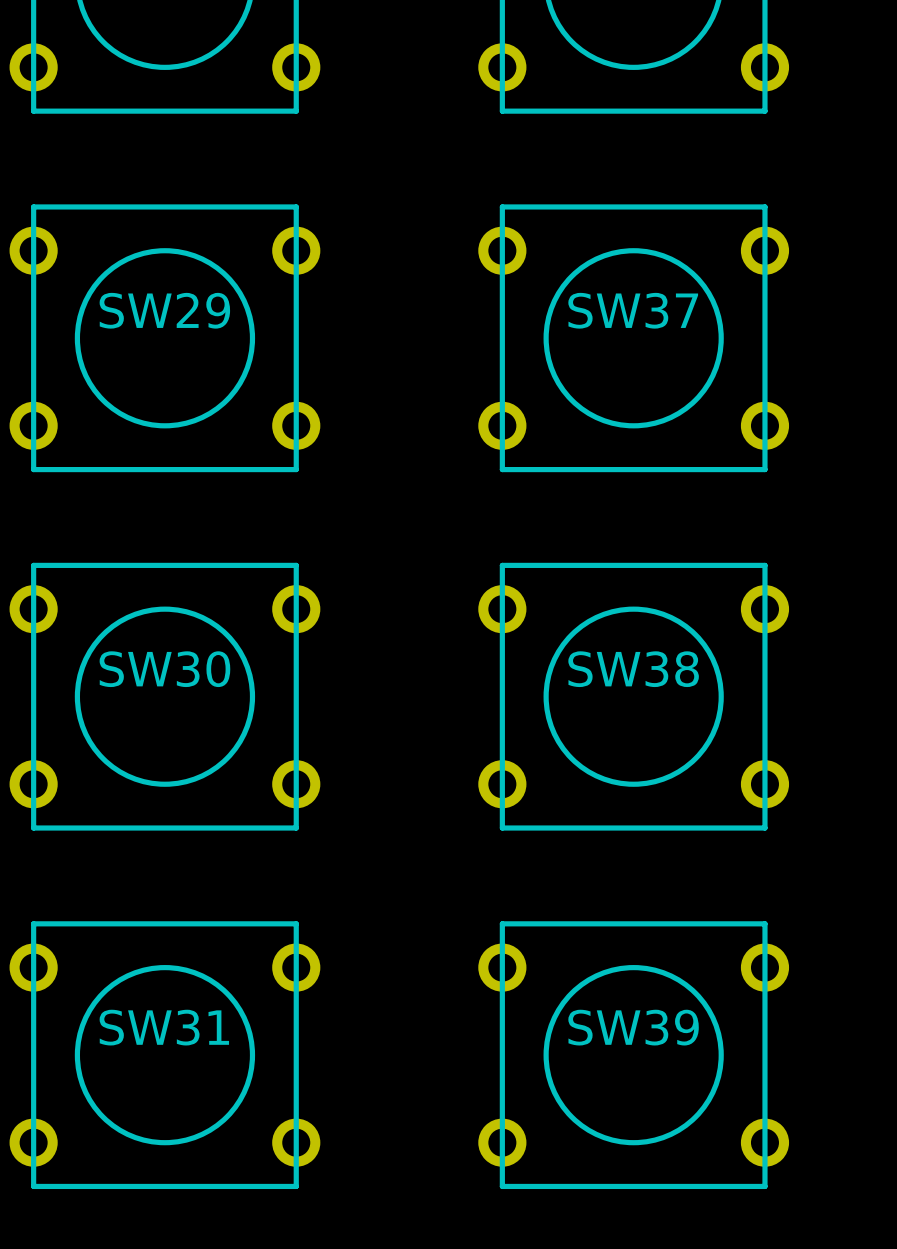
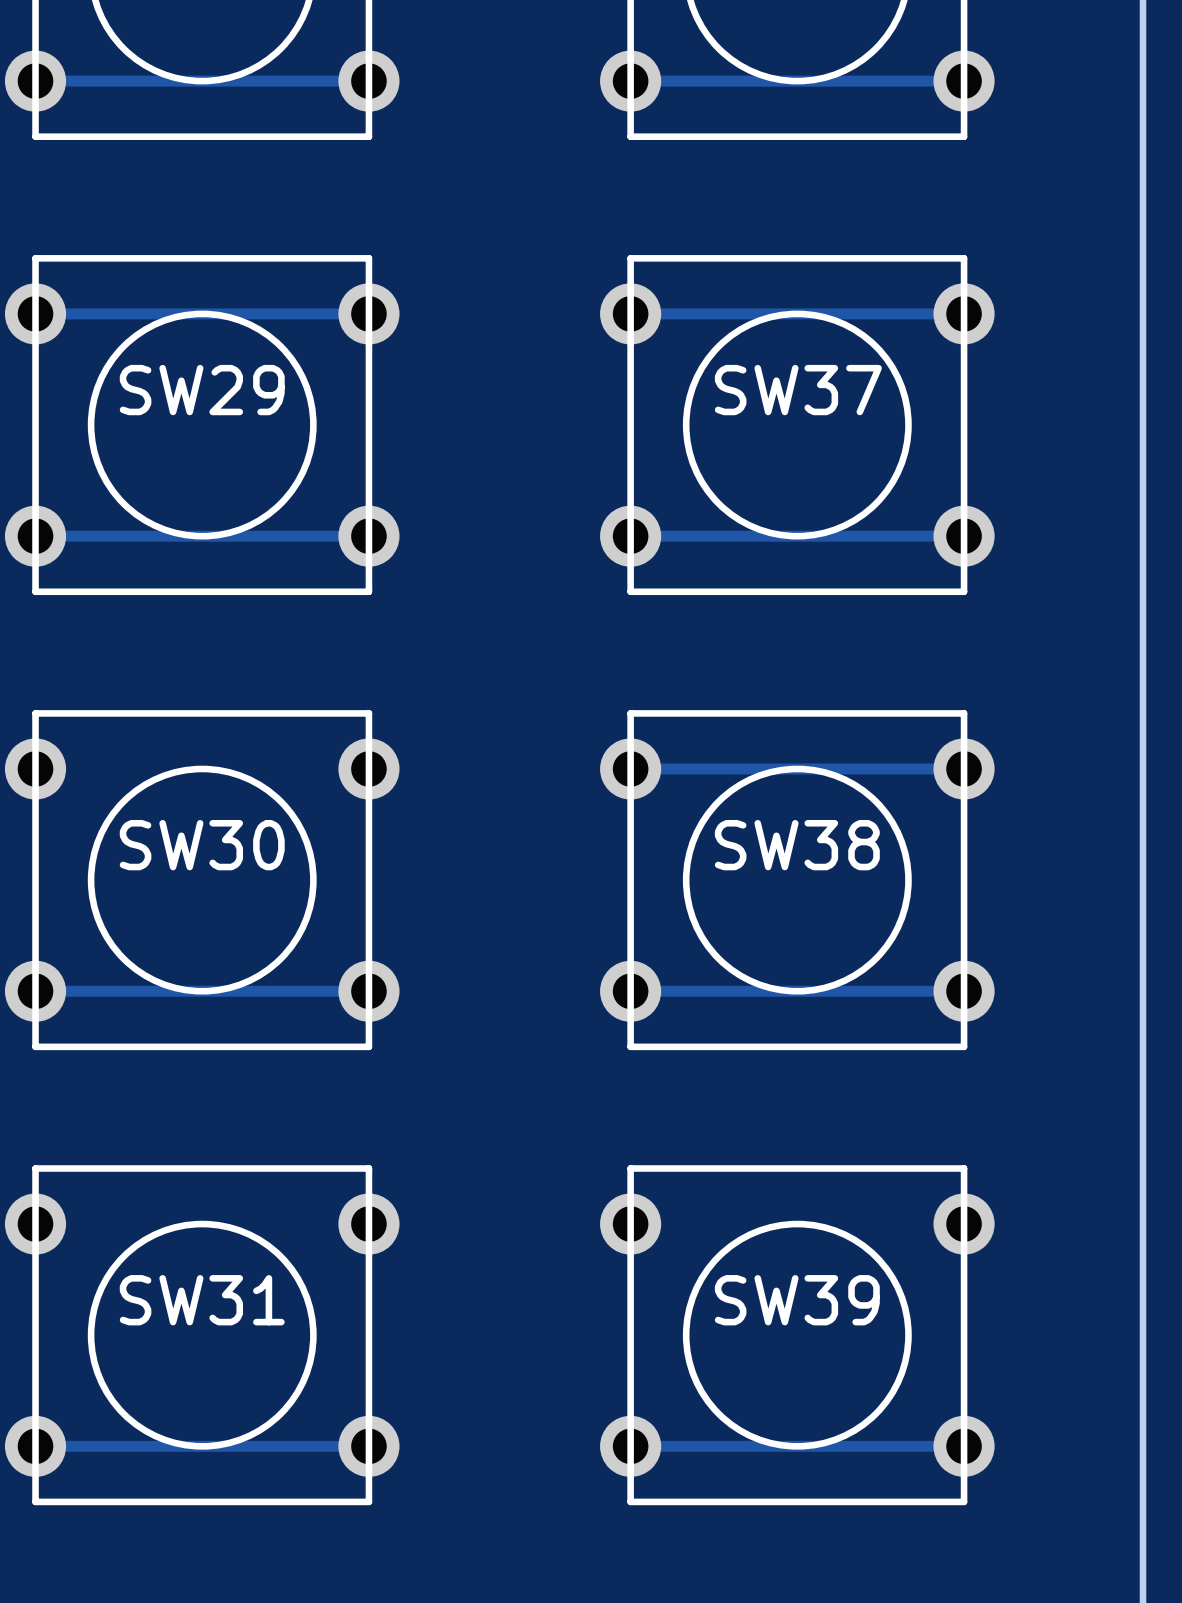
track: none -> (368, 81) (35, 81)
track: none -> (964, 81) (630, 81)
track: none -> (368, 313) (35, 313)
track: none -> (964, 313) (630, 313)
track: none -> (368, 536) (35, 536)
track: none -> (964, 536) (630, 536)
track: none -> (964, 768) (630, 768)
track: none -> (368, 991) (35, 991)
track: none -> (964, 991) (630, 991)
track: none -> (368, 1446) (35, 1446)
track: none -> (964, 1446) (630, 1446)

